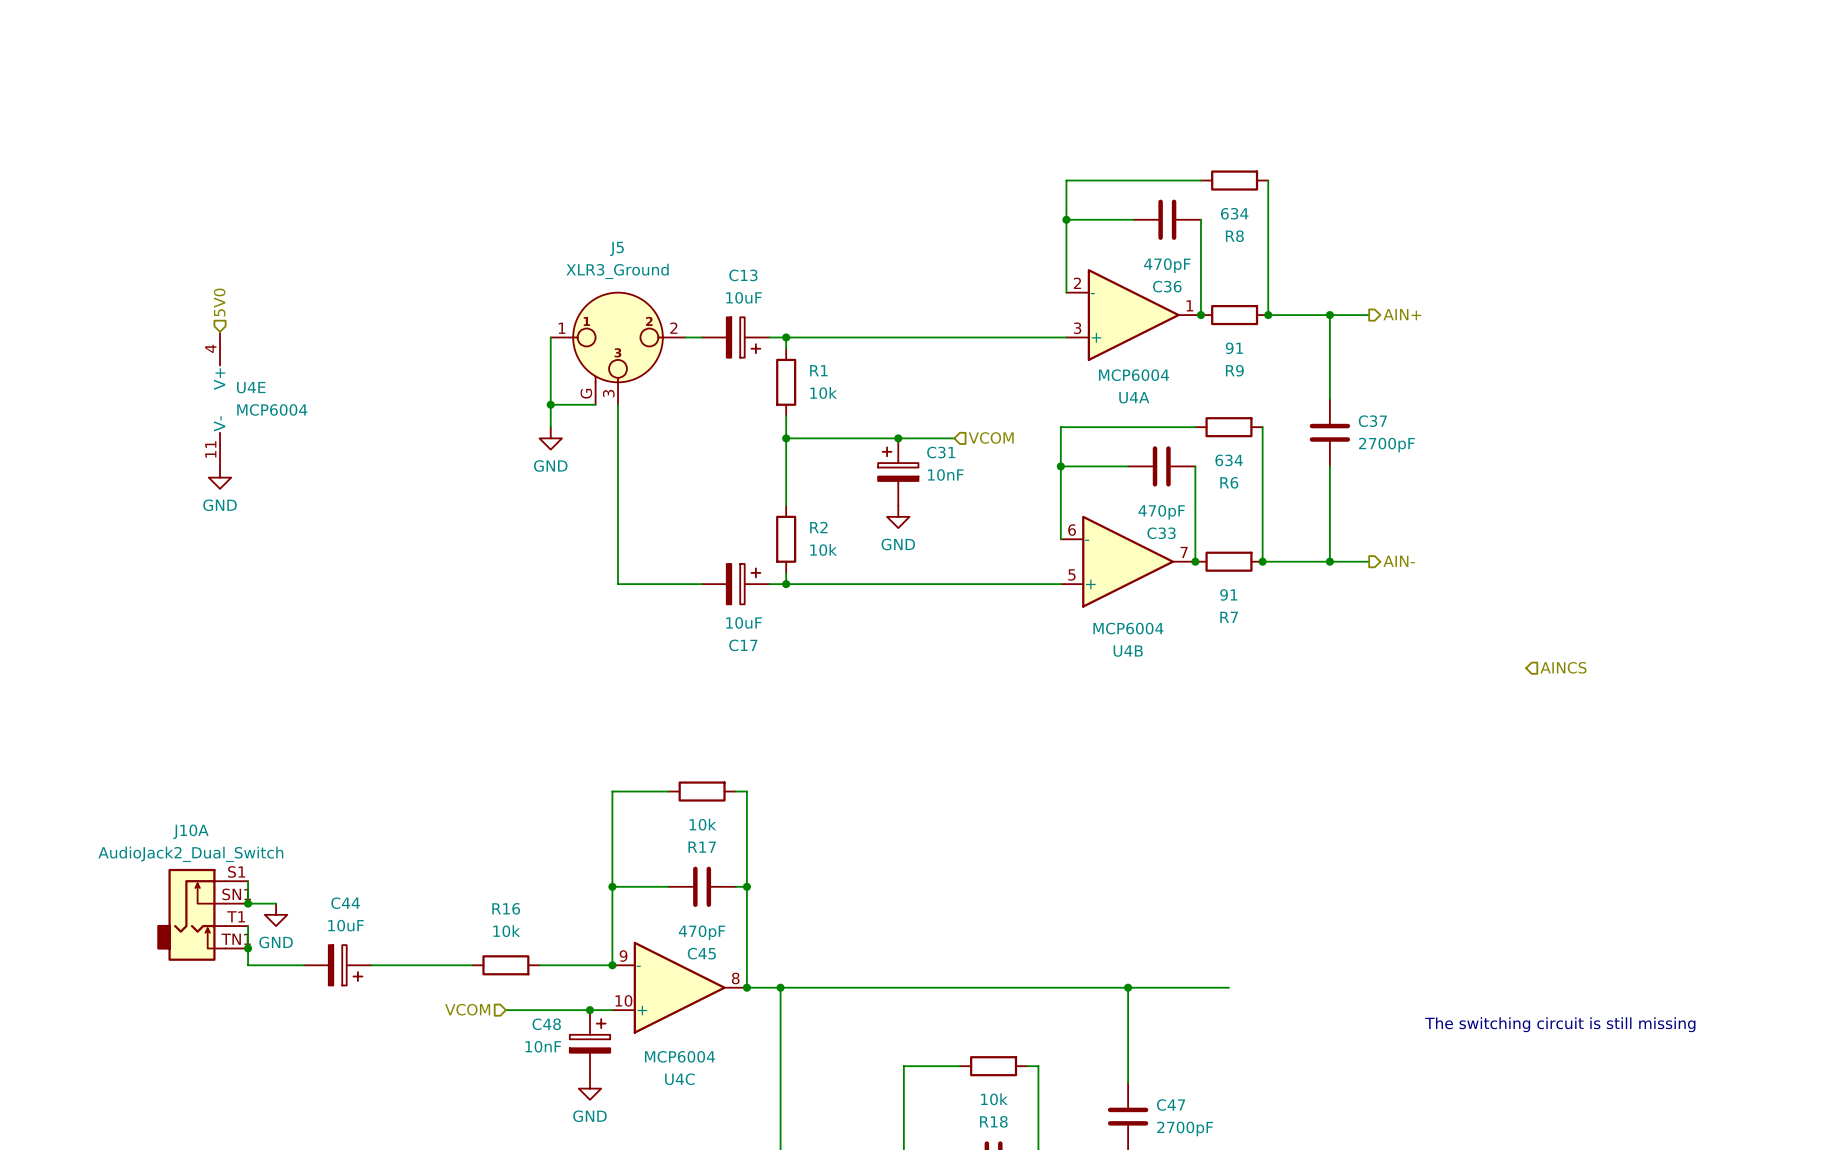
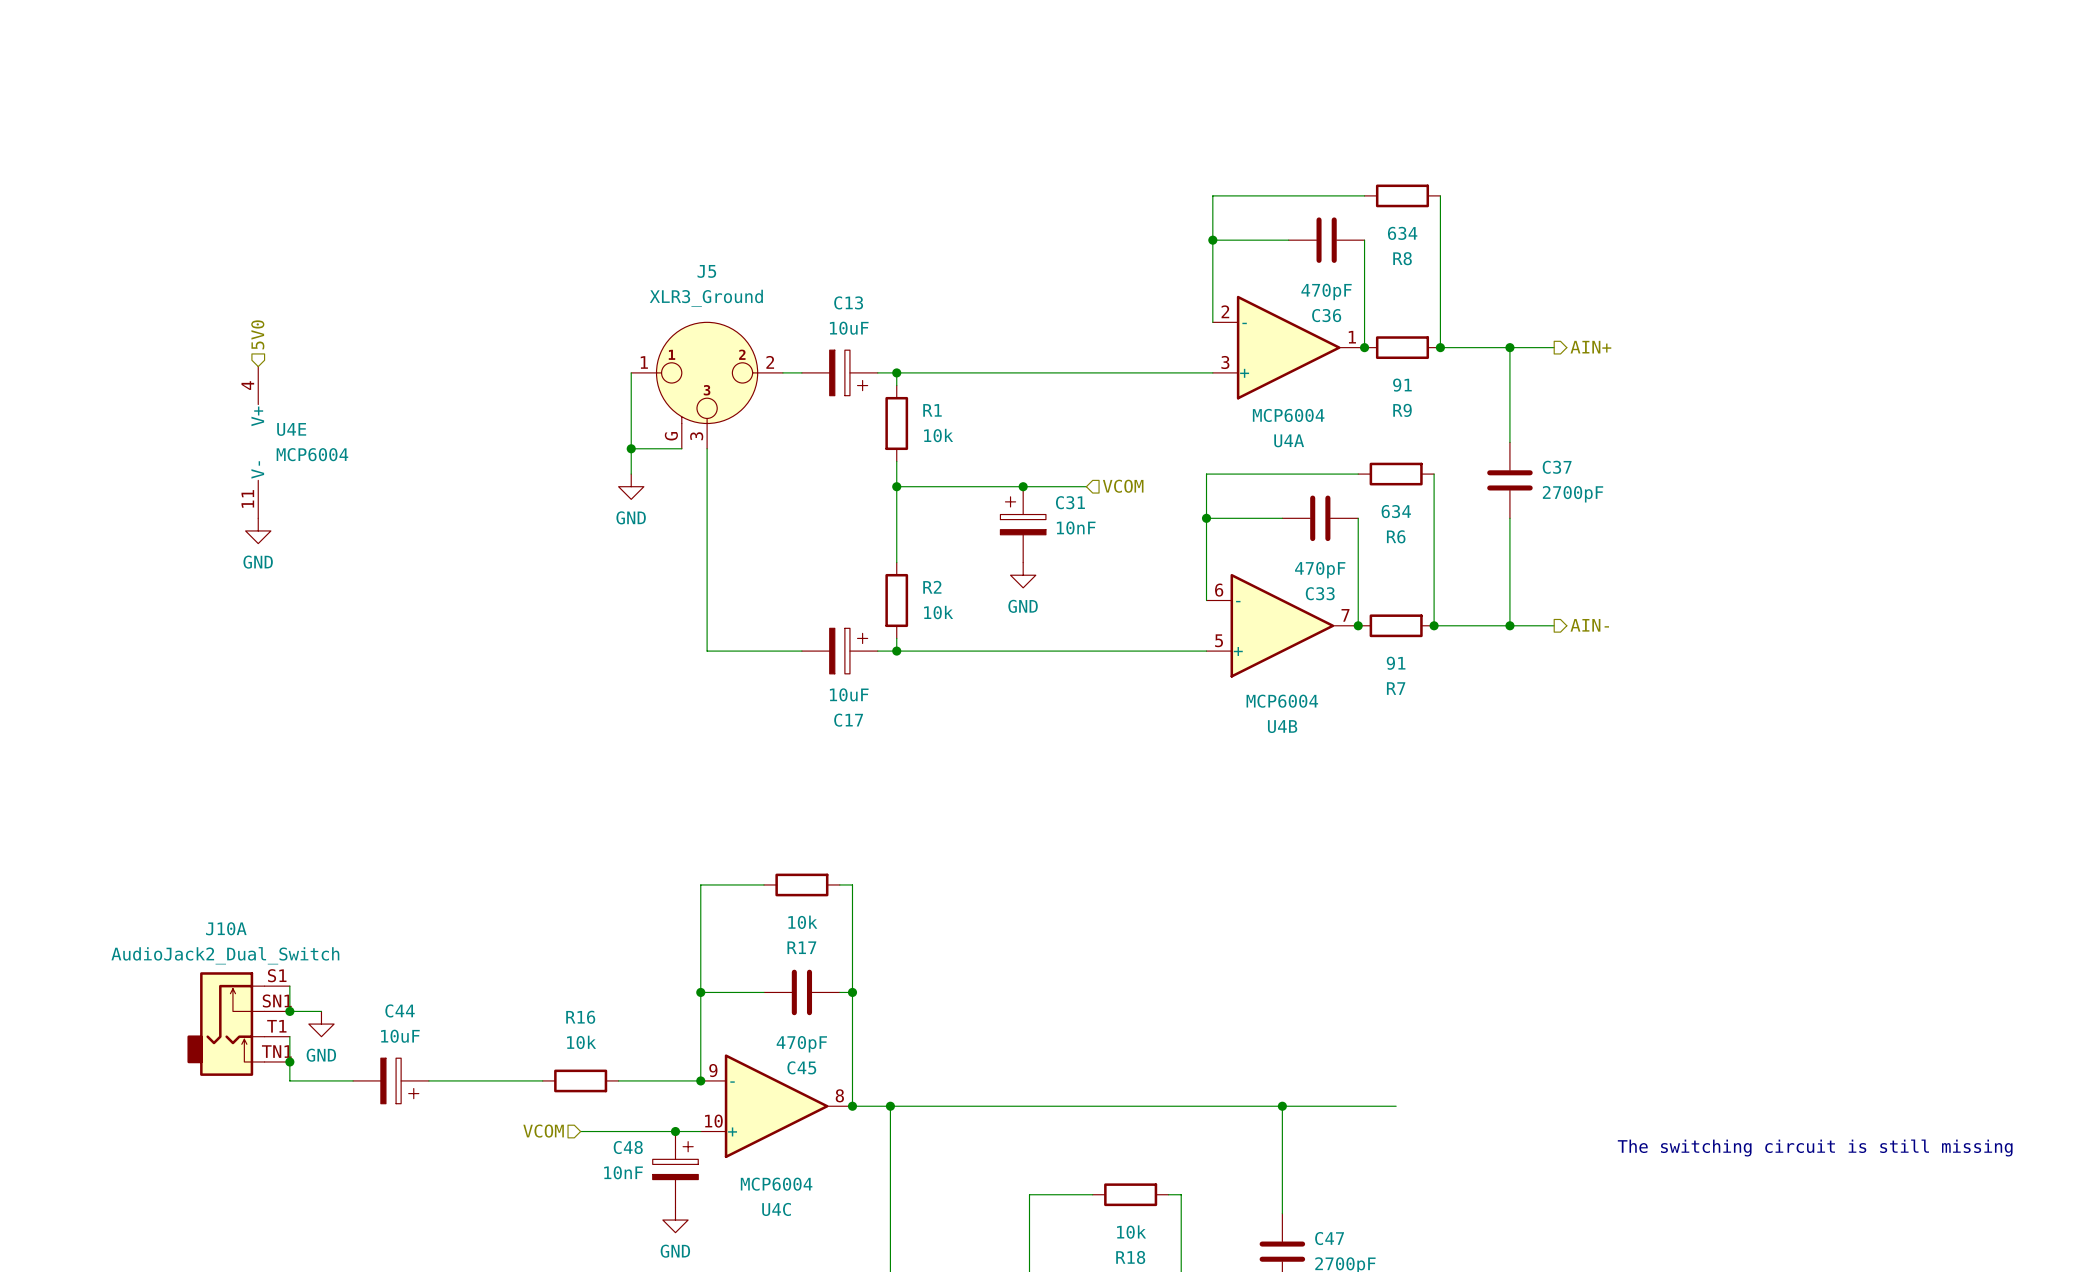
hierarchical label: AINCS (1563, 667) -> none

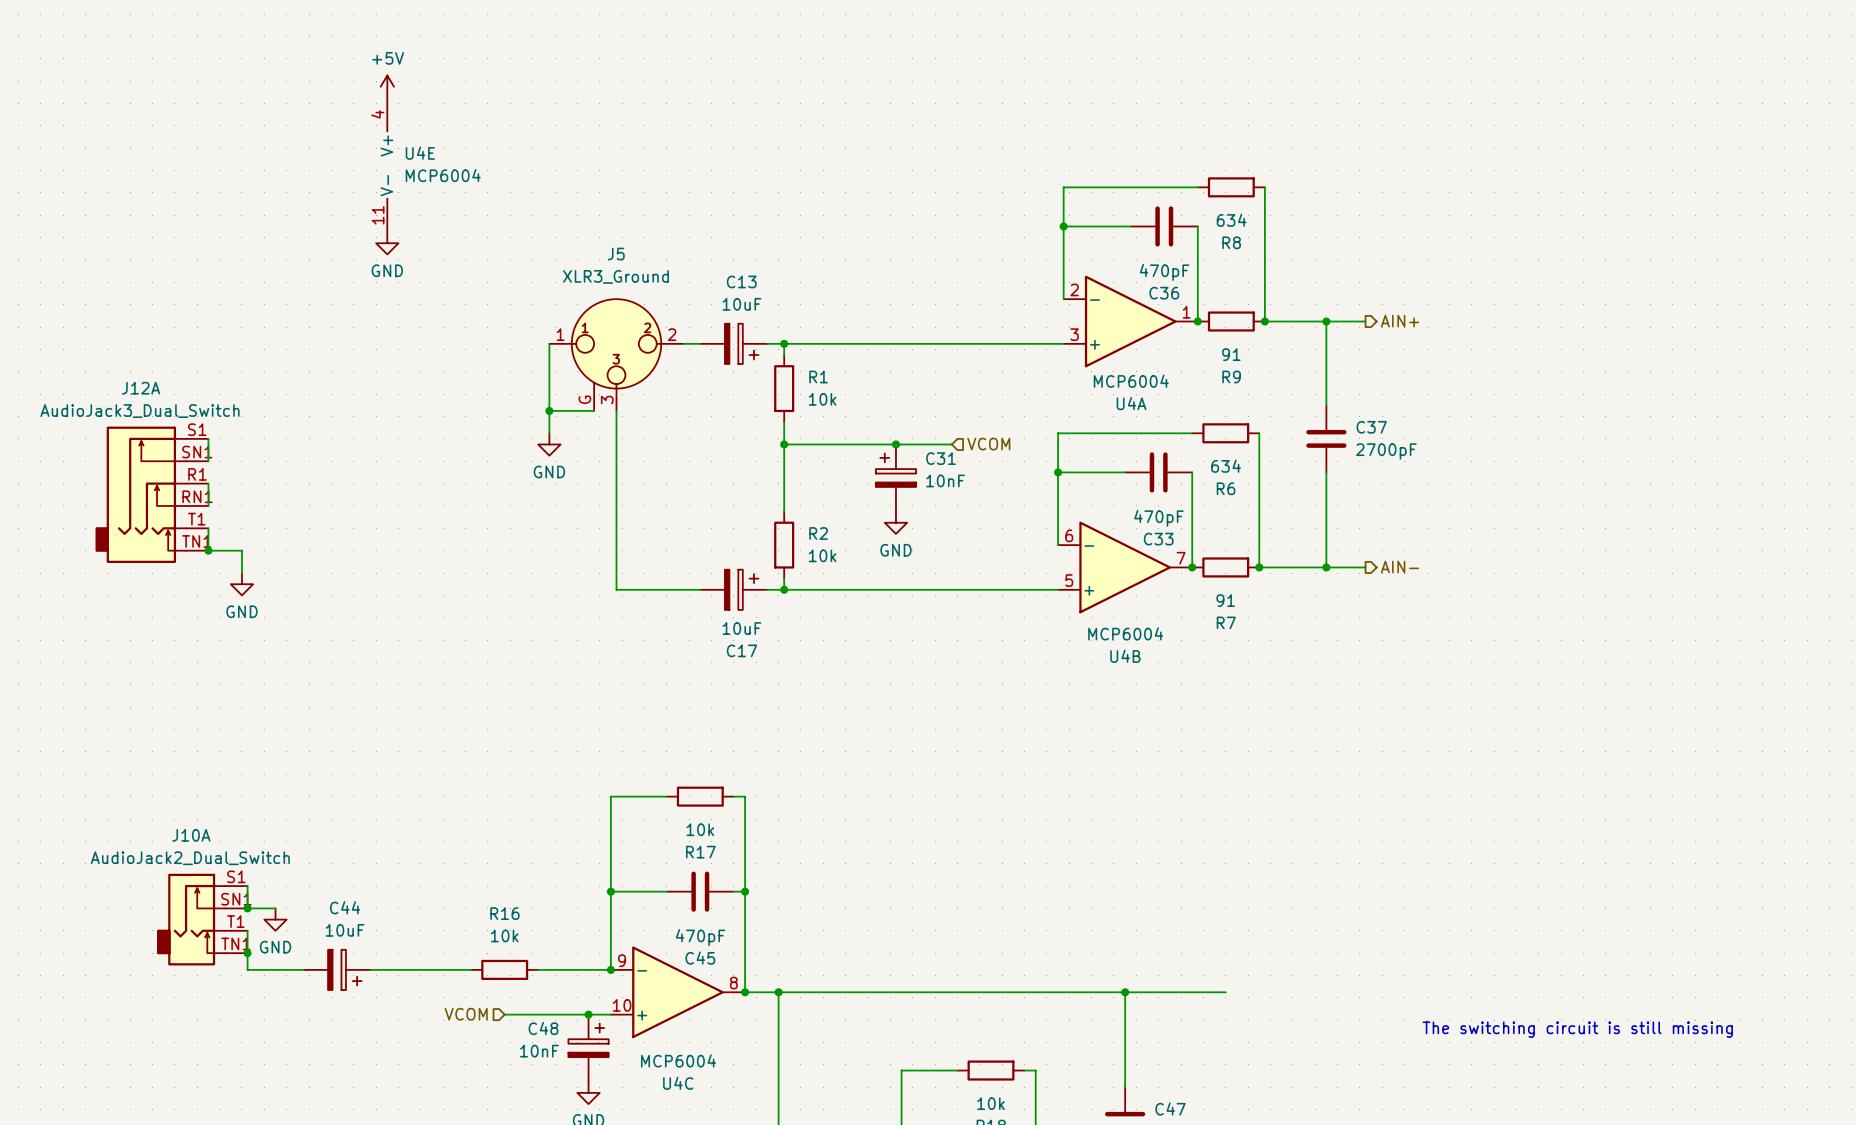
power symbol: none -> +5V (387, 86)
power symbol: none -> GND (387, 243)
hierarchical label: 5V0 (257, 334) -> none
U4E position: (258, 442) -> (387, 165)
wire: none -> (208, 438) (208, 461)
wire: none -> (208, 483) (208, 505)
power symbol position: GND (258, 530) -> GND (241, 584)
J12A: none -> AudioJack3_Dual_Switch (151, 494)
wire: none -> (208, 528) (208, 550) (241, 550) (241, 573)
junction: none -> (208, 550)

